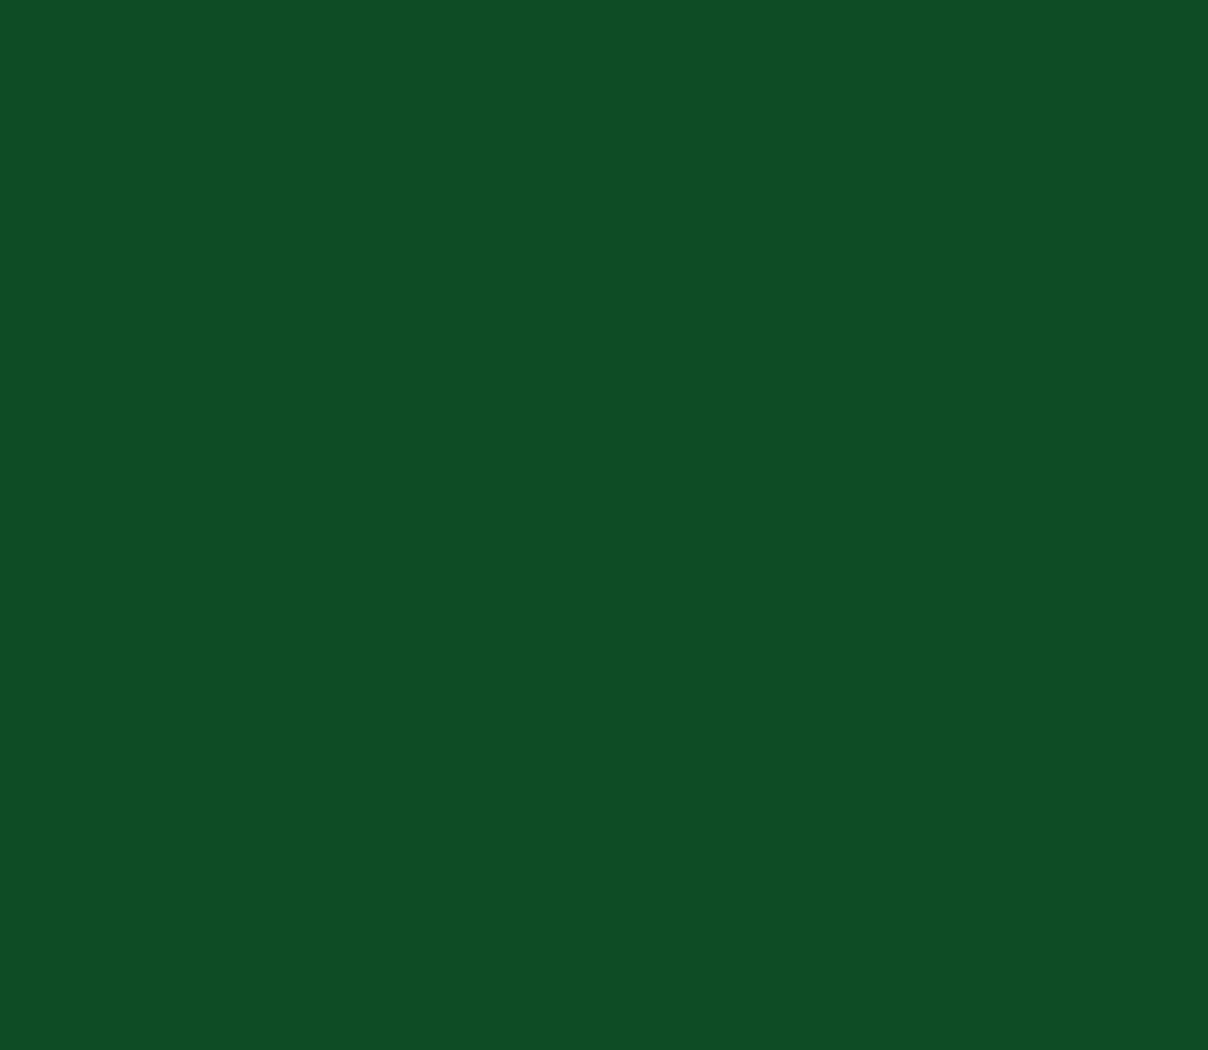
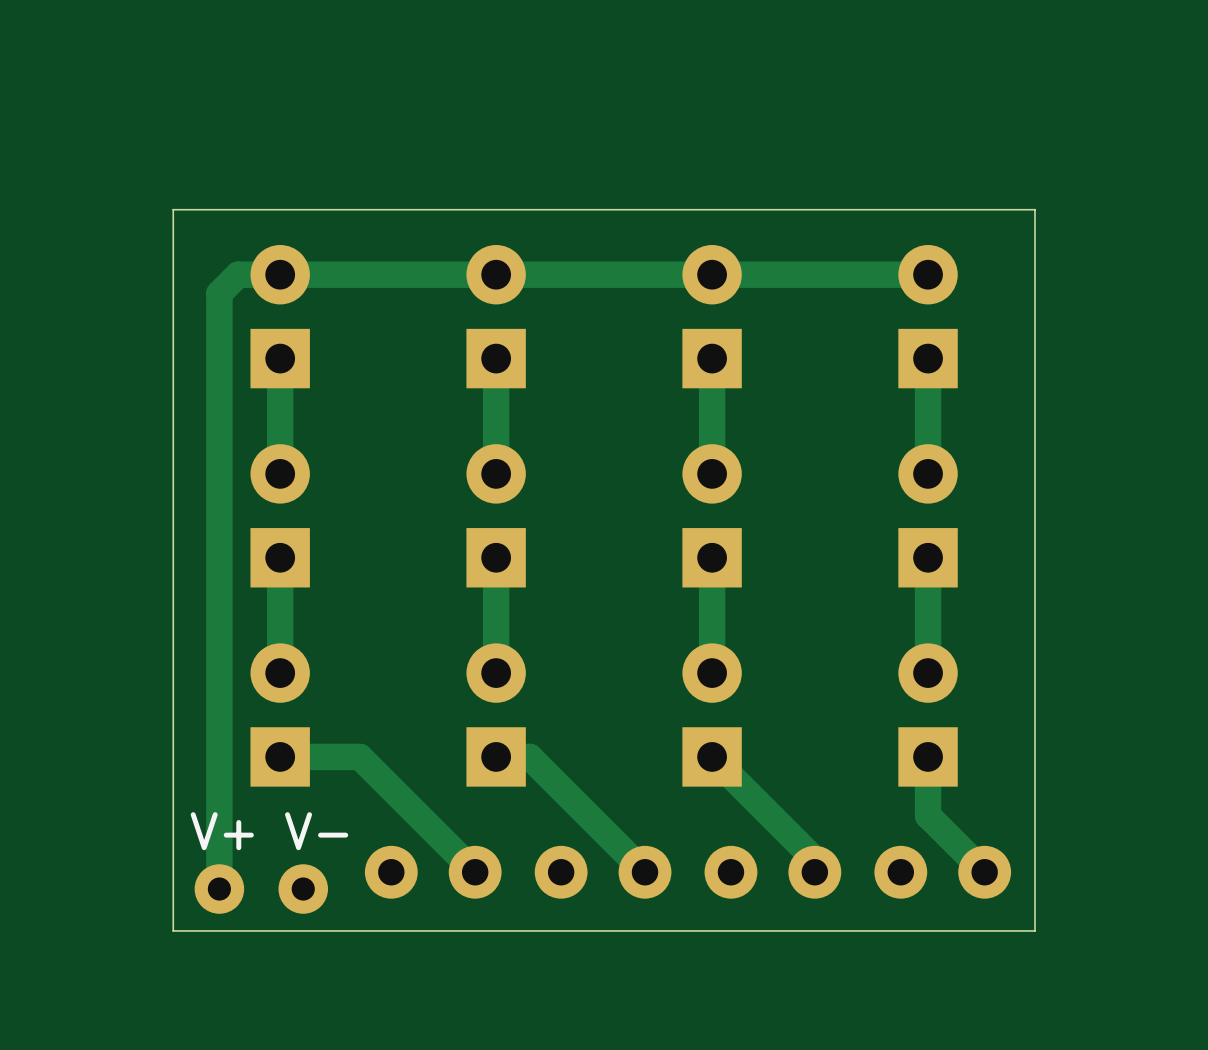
board edge: none -> (1034, 209) (173, 209) (173, 930) (1034, 930) (1034, 209)
track: none -> (928, 274) (238, 274) (219, 293) (219, 889)
part: none -> (280, 316)
part: none -> (496, 316)
part: none -> (712, 316)
part: none -> (928, 316)
track: none -> (280, 358) (280, 473)
track: none -> (496, 358) (496, 473)
track: none -> (712, 358) (712, 473)
track: none -> (928, 358) (928, 473)
part: none -> (280, 515)
part: none -> (496, 515)
part: none -> (712, 515)
part: none -> (928, 515)
track: none -> (280, 557) (280, 673)
track: none -> (496, 557) (496, 673)
track: none -> (712, 557) (712, 673)
track: none -> (928, 557) (928, 673)
part: none -> (280, 715)
part: none -> (496, 715)
part: none -> (712, 715)
part: none -> (928, 715)
track: none -> (280, 756) (359, 756) (475, 872)
track: none -> (496, 756) (529, 756) (645, 872)
track: none -> (712, 756) (814, 859) (814, 872)
track: none -> (928, 756) (928, 815) (984, 872)
text: none -> V+ V- (269, 831)
part: none -> (433, 872)
part: none -> (603, 872)
part: none -> (772, 872)
part: none -> (942, 872)
part: none -> (219, 889)
part: none -> (303, 889)

